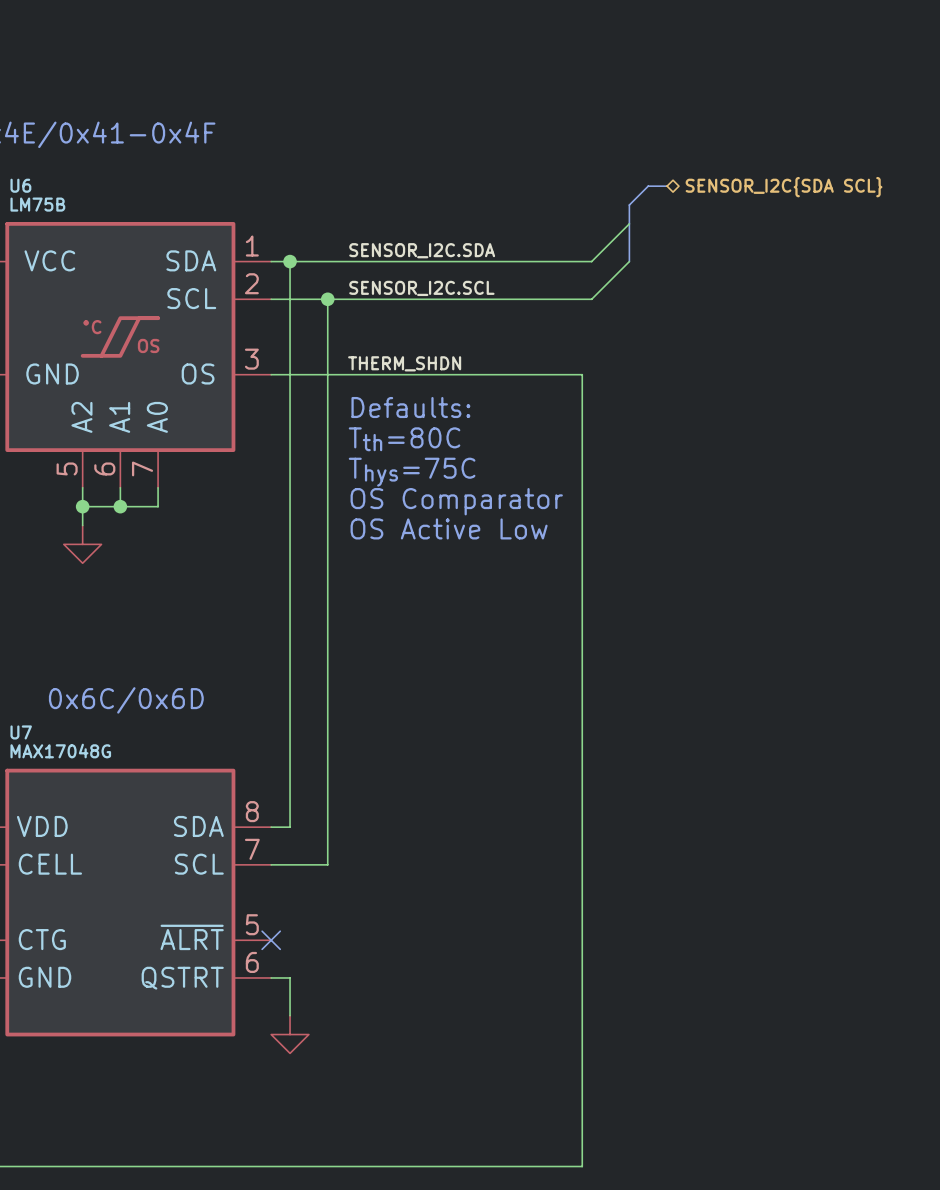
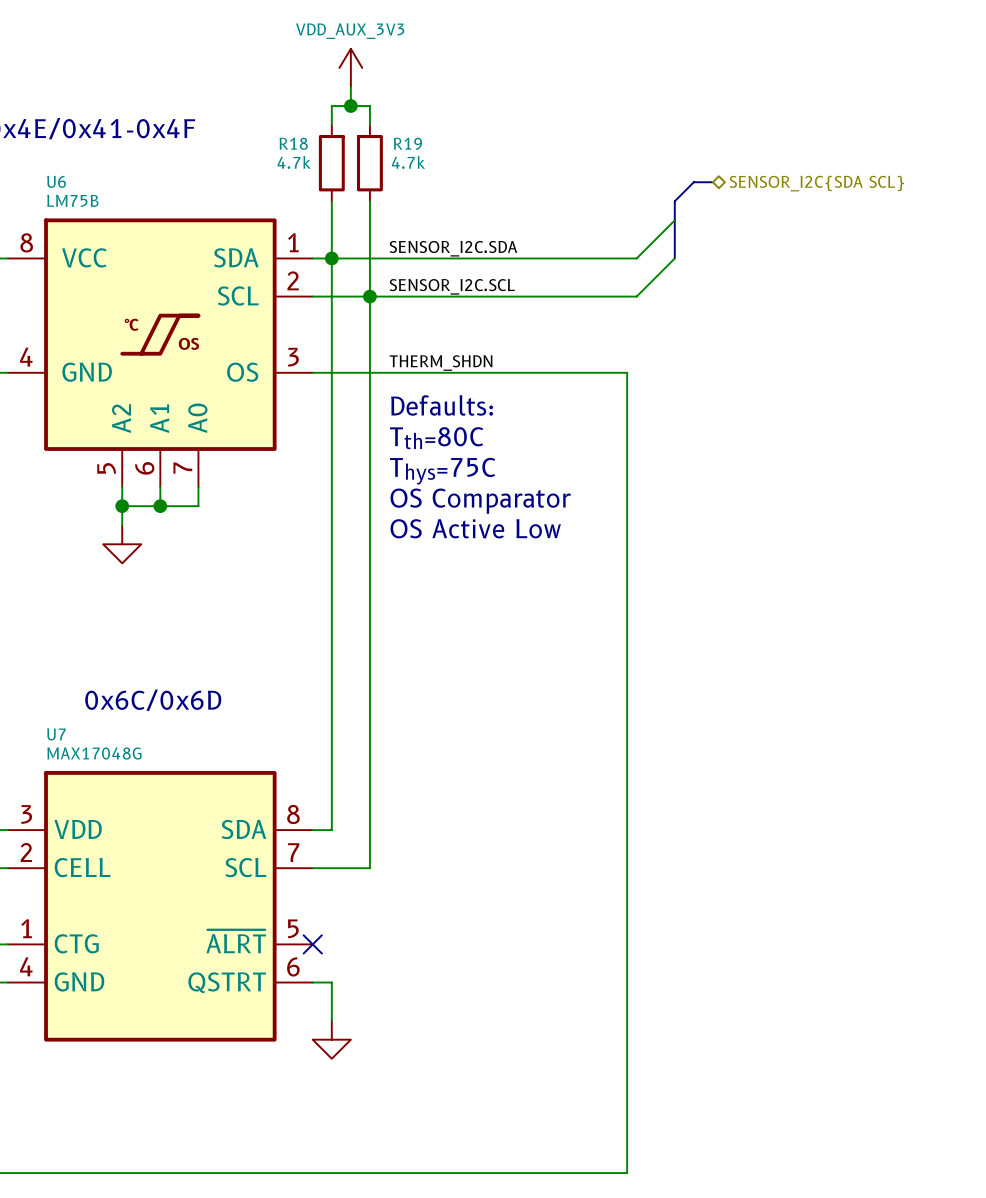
power symbol: none -> VDD_AUX_3V3 (350, 67)
wire: none -> (350, 86) (350, 106)
junction: none -> (350, 106)
wire: none -> (331, 125) (331, 106) (369, 106) (369, 125)
R18: none -> 4.7k (331, 163)
R19: none -> 4.7k (369, 163)
wire: none -> (331, 201) (331, 258)
wire: none -> (369, 201) (369, 296)

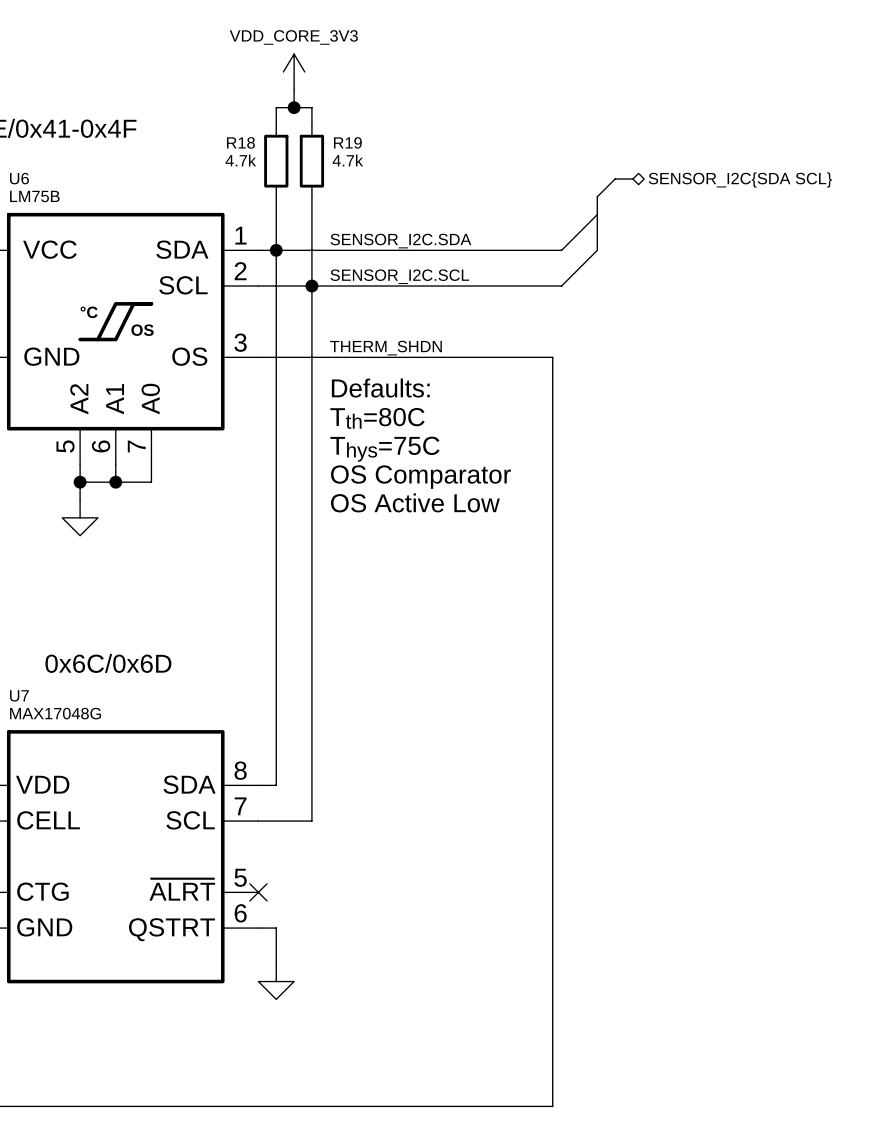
power symbol: VDD_AUX_3V3 (350, 67) -> VDD_CORE_3V3 (294, 72)

